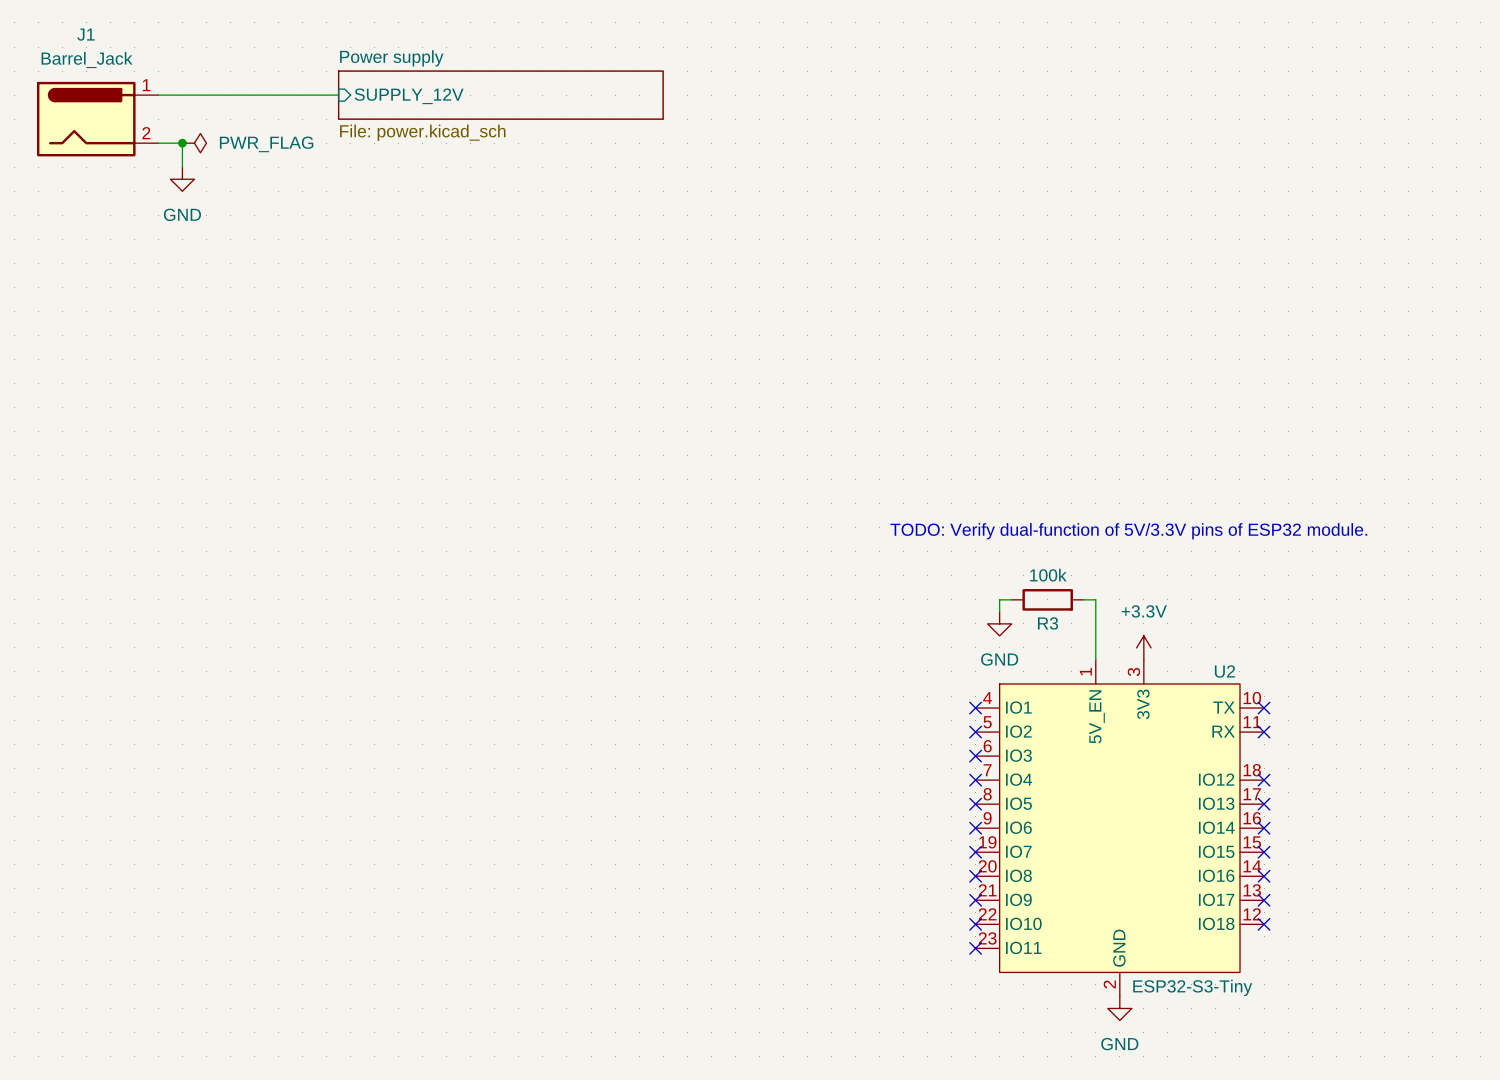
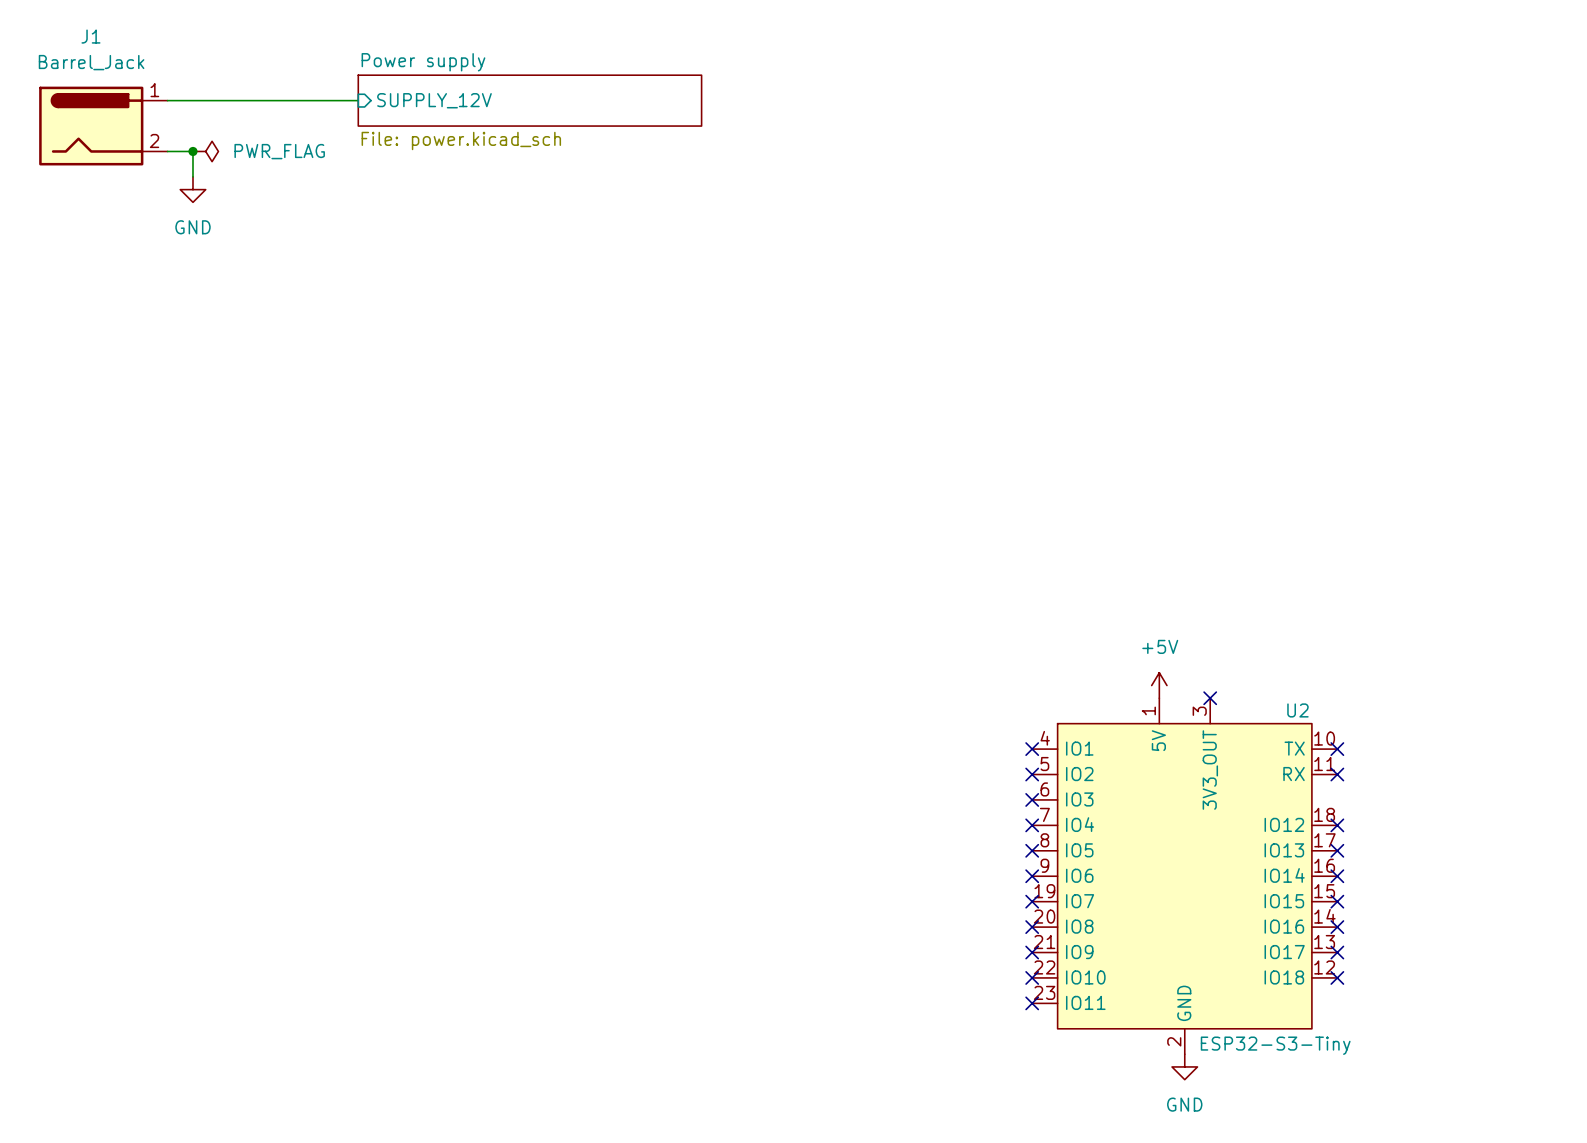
text: TODO: Verify dual-function of 5V/3.3V pins of ESP32 module. (1128, 531) -> none
wire: (1011, 599) (999, 599) (999, 611) -> none
R3: 100k (1047, 599) -> none
wire: (1083, 599) (1095, 599) (1095, 659) -> none
power symbol: GND (999, 623) -> none
power symbol: none -> +5V (1159, 685)
power symbol: +3.3V (1143, 647) -> none
no-connect mark: none -> (1210, 698)
U2 pin name: 3V3 (1143, 704) -> 3V3_OUT (1210, 770)
U2 pin name: 5V_EN (1097, 716) -> 5V (1158, 740)

